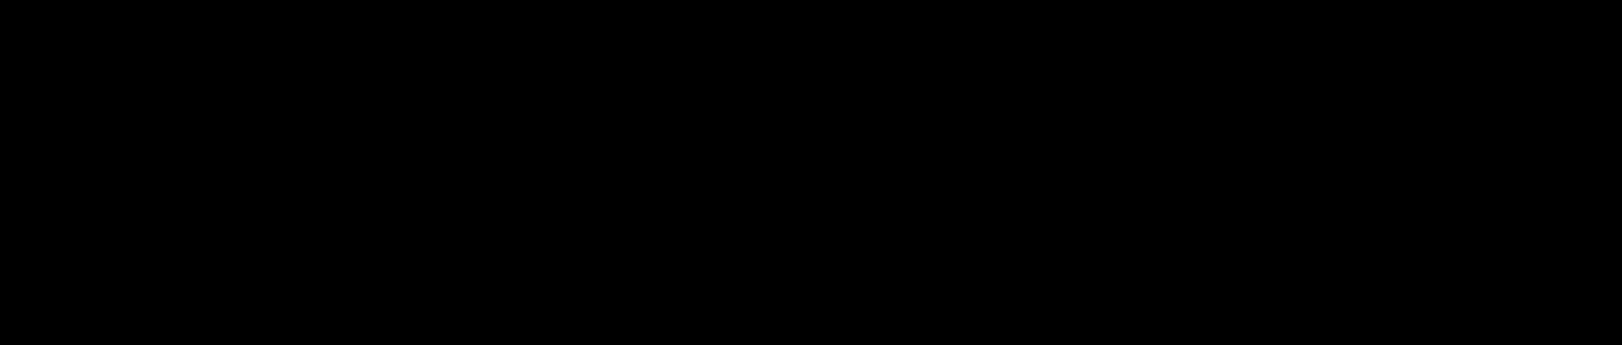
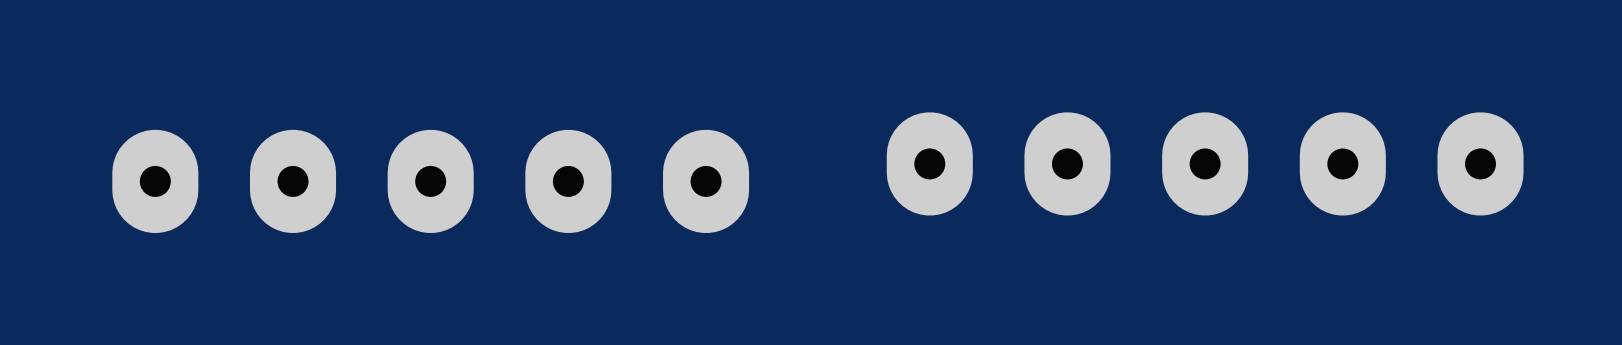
part: none -> (1205, 163)
part: none -> (430, 181)

